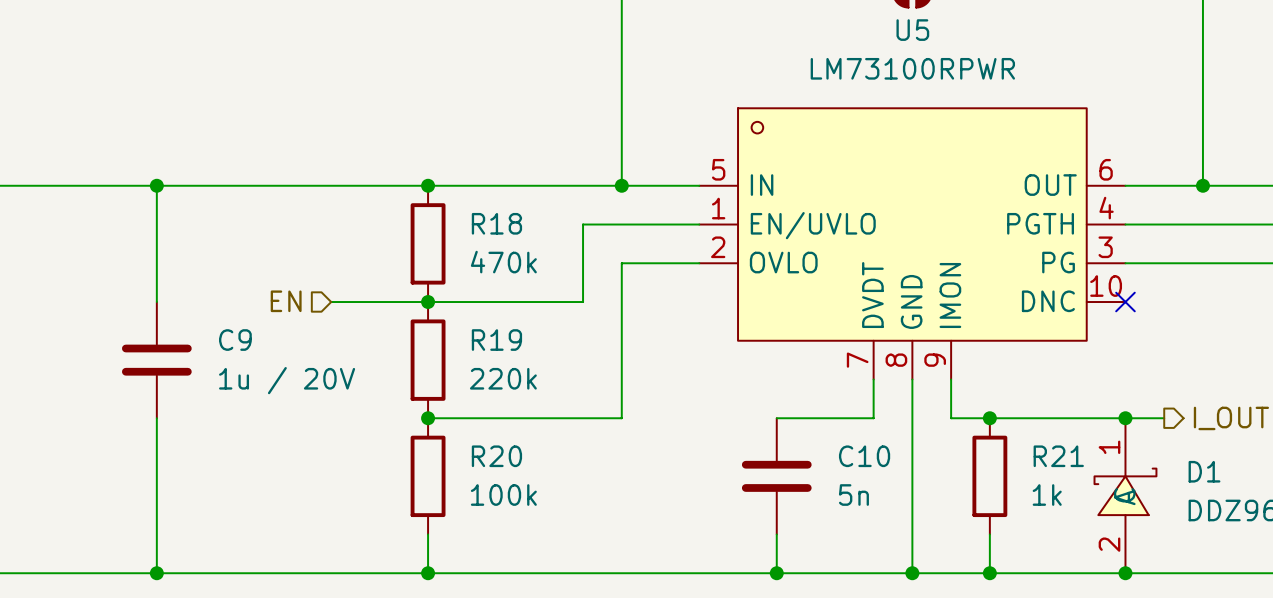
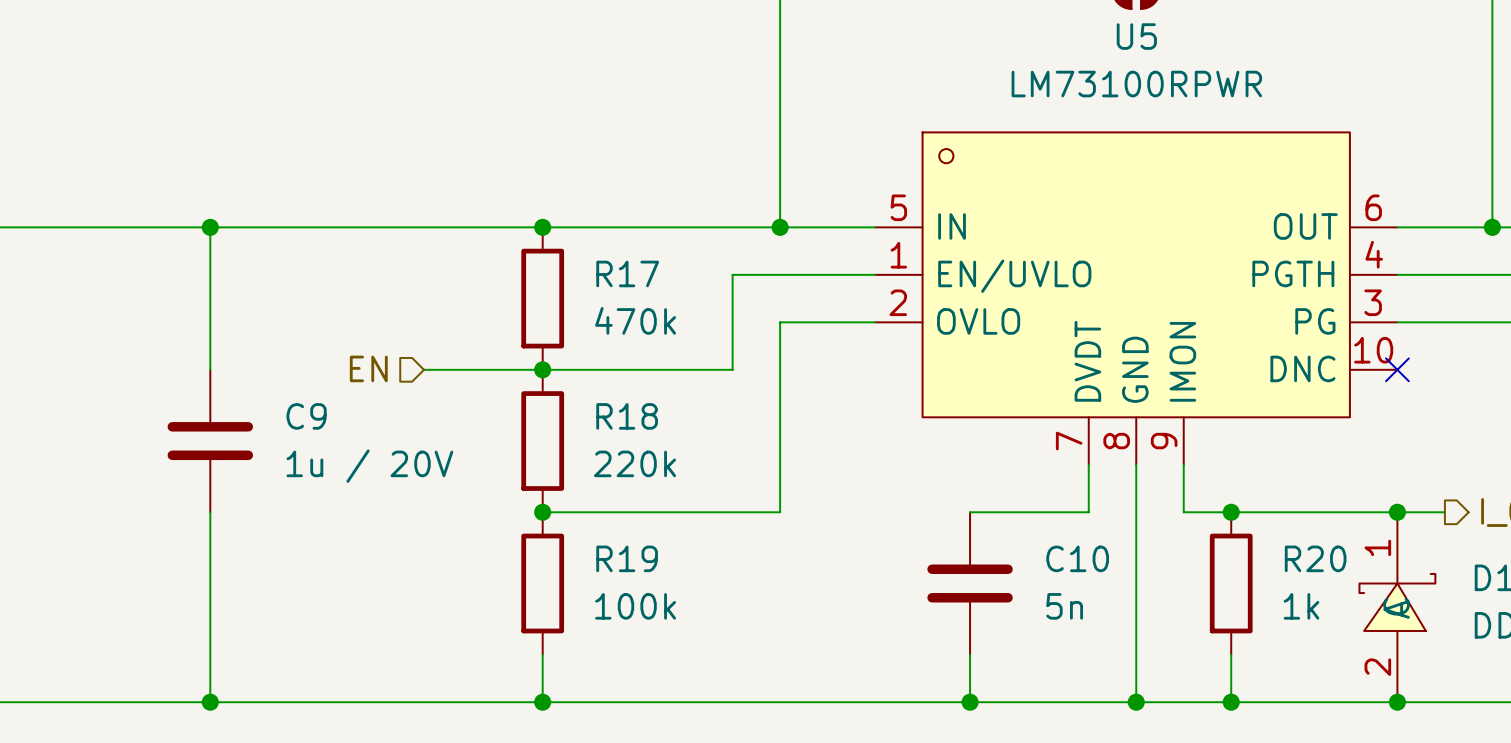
R18 name: R18 (496, 223) -> R17 (627, 273)
R19 name: R19 (496, 340) -> R18 (627, 416)
R20 name: R20 (496, 456) -> R19 (627, 558)
R21 name: R21 (1058, 456) -> R20 (1315, 558)

